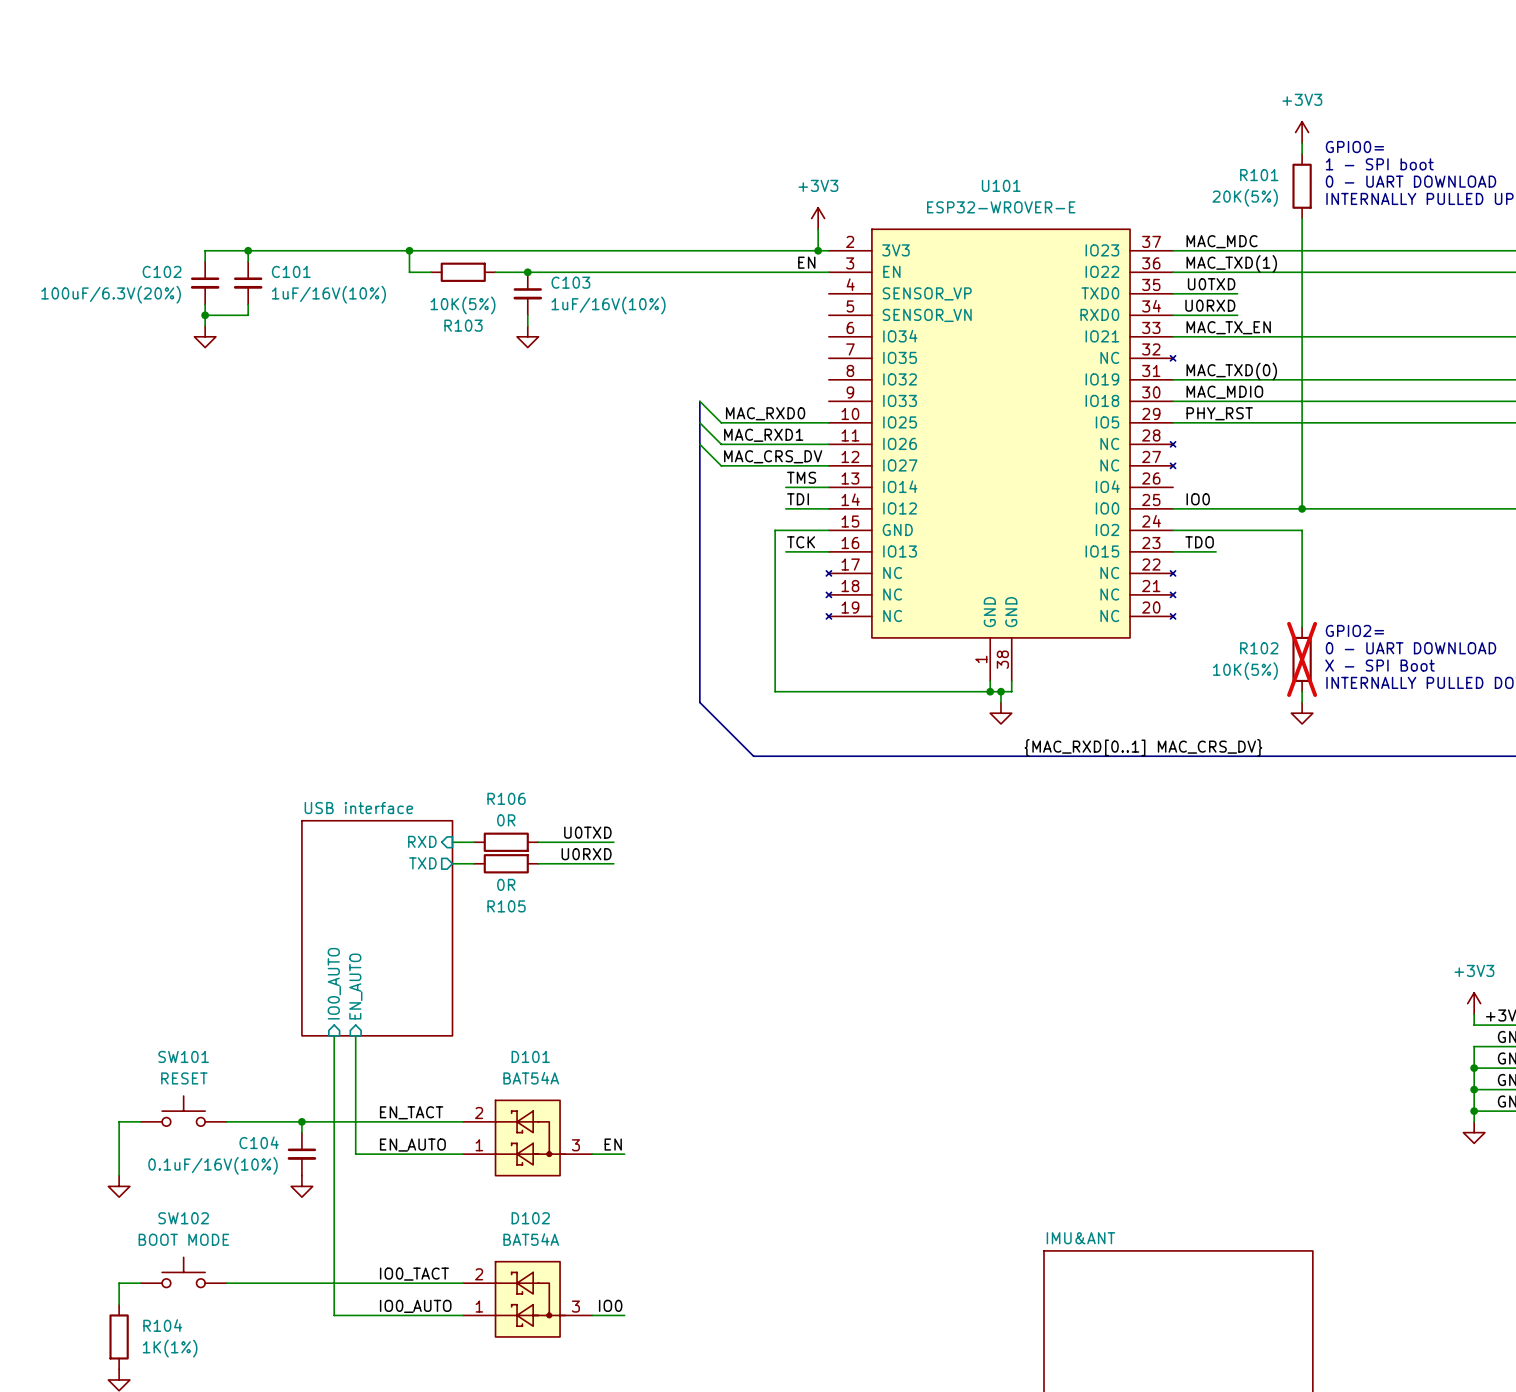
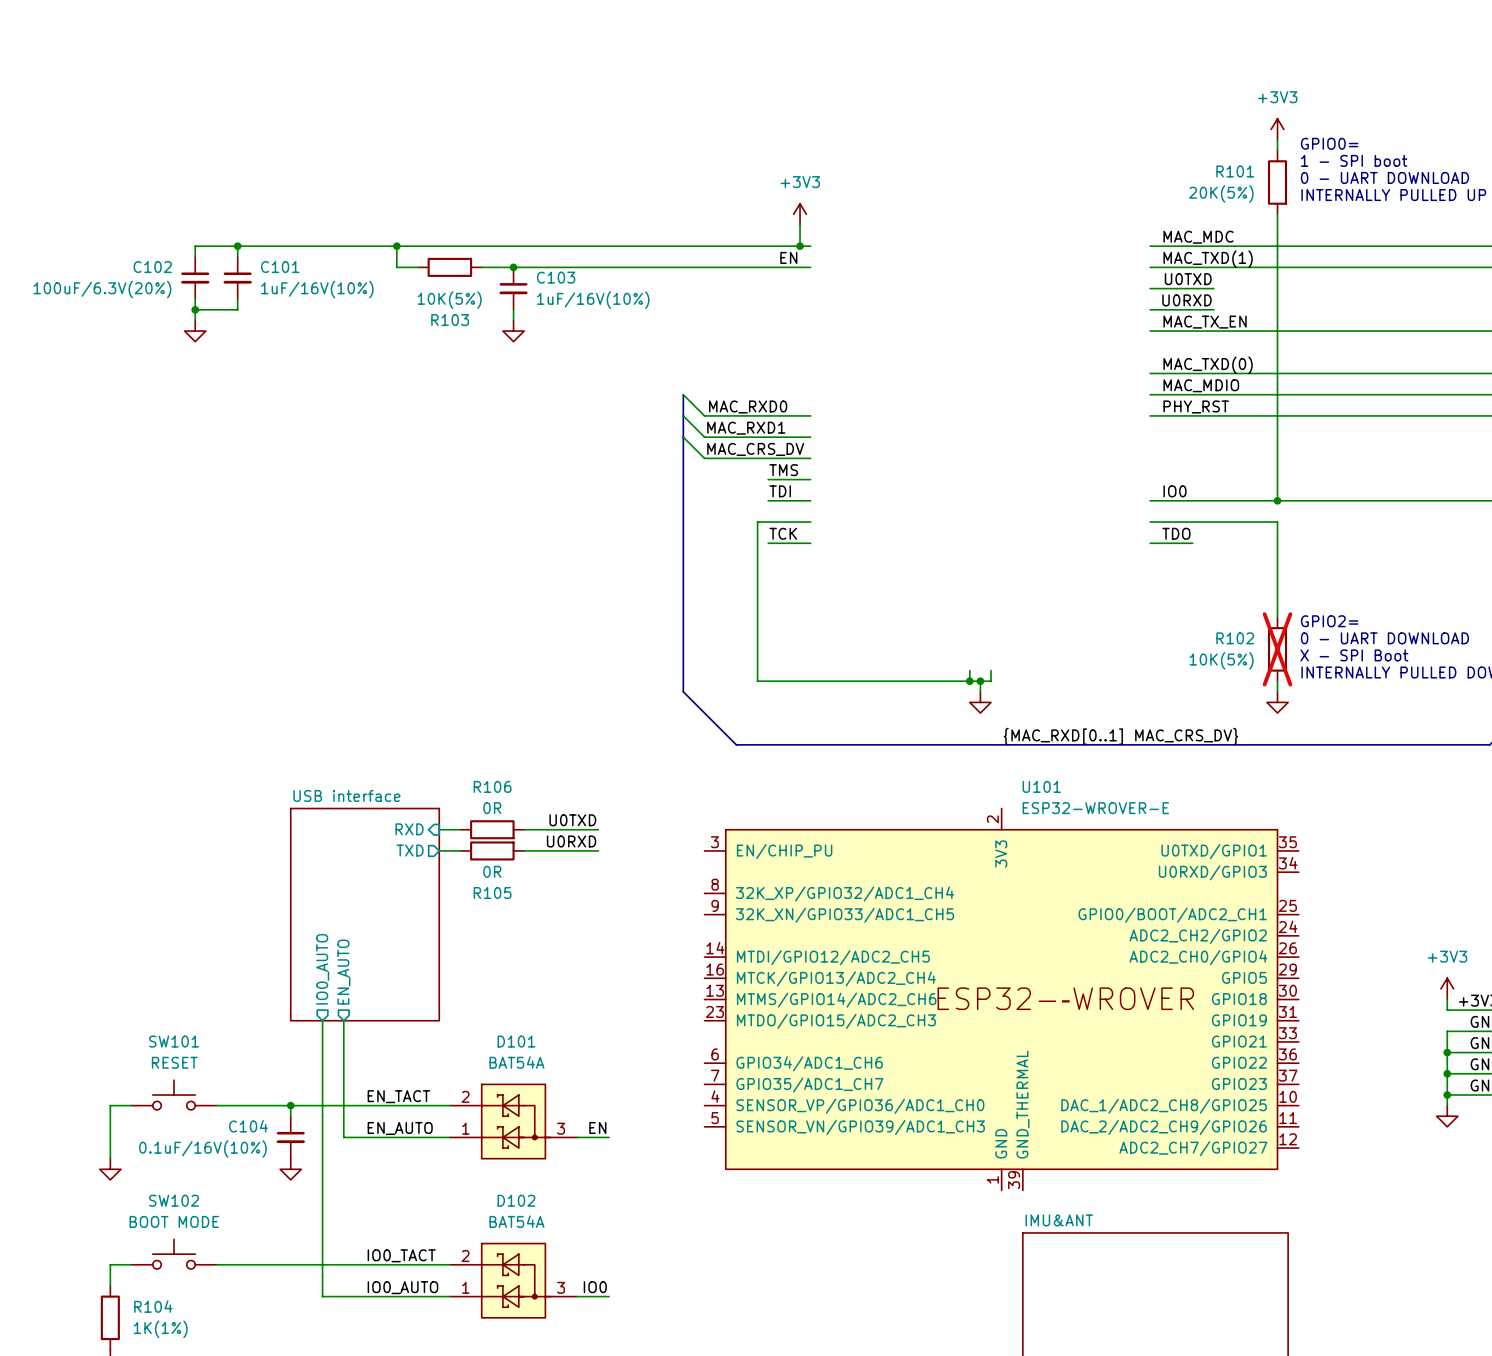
U101 name position: U101 (1001, 185) -> U101 (1041, 786)
U101 value position: ESP32-WROVER-E (1001, 207) -> ESP32-WROVER-E (1095, 808)
U101 symbol: [826, 229, 1176, 681] -> [704, 808, 1299, 1191]
sheet pin shape: input (334, 983) -> output (322, 969)
sheet pin shape: input (355, 986) -> output (343, 972)

